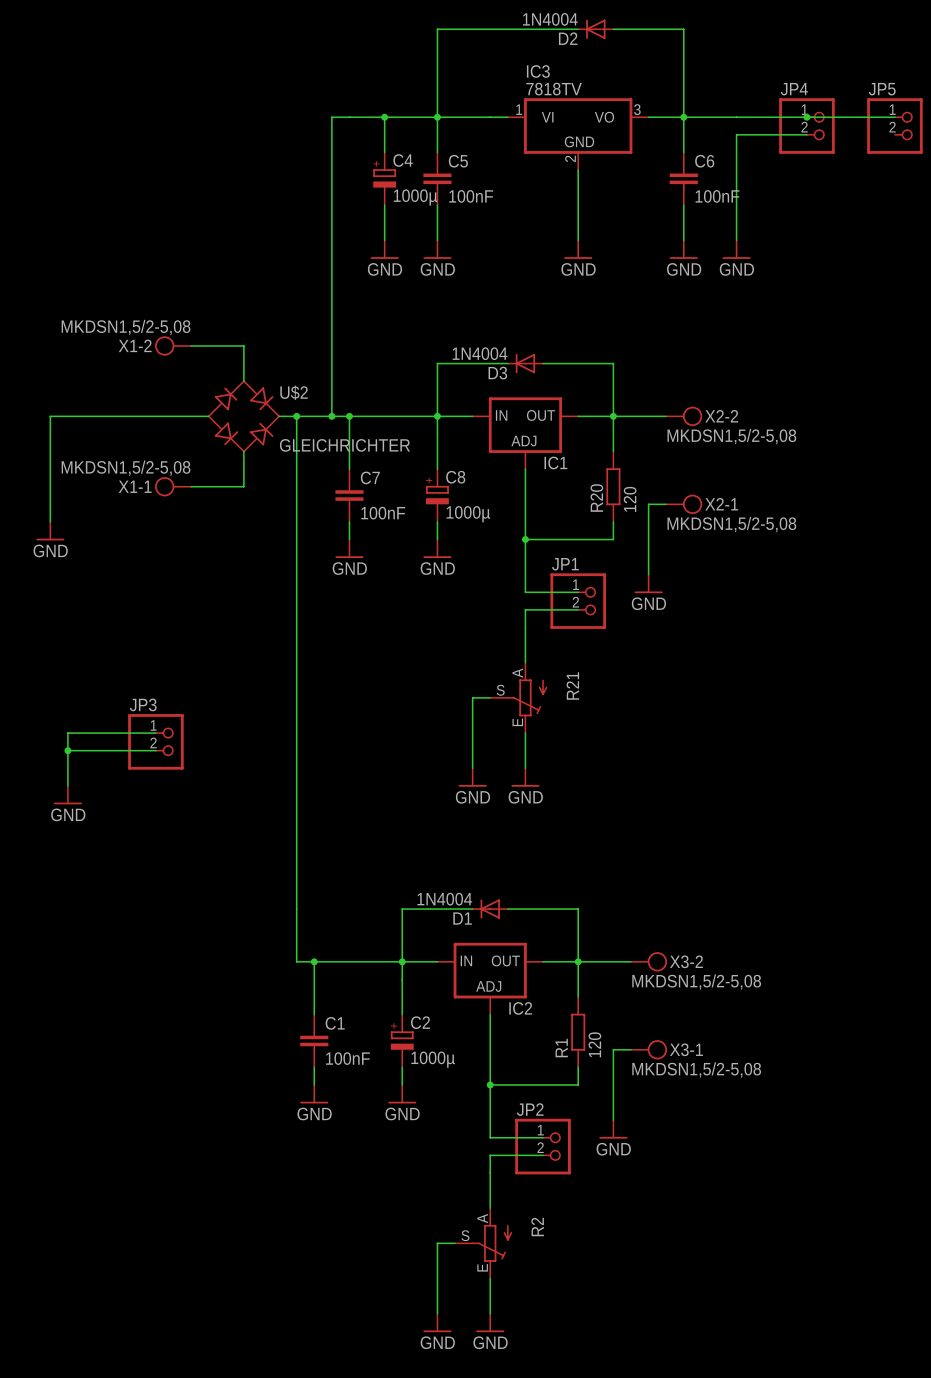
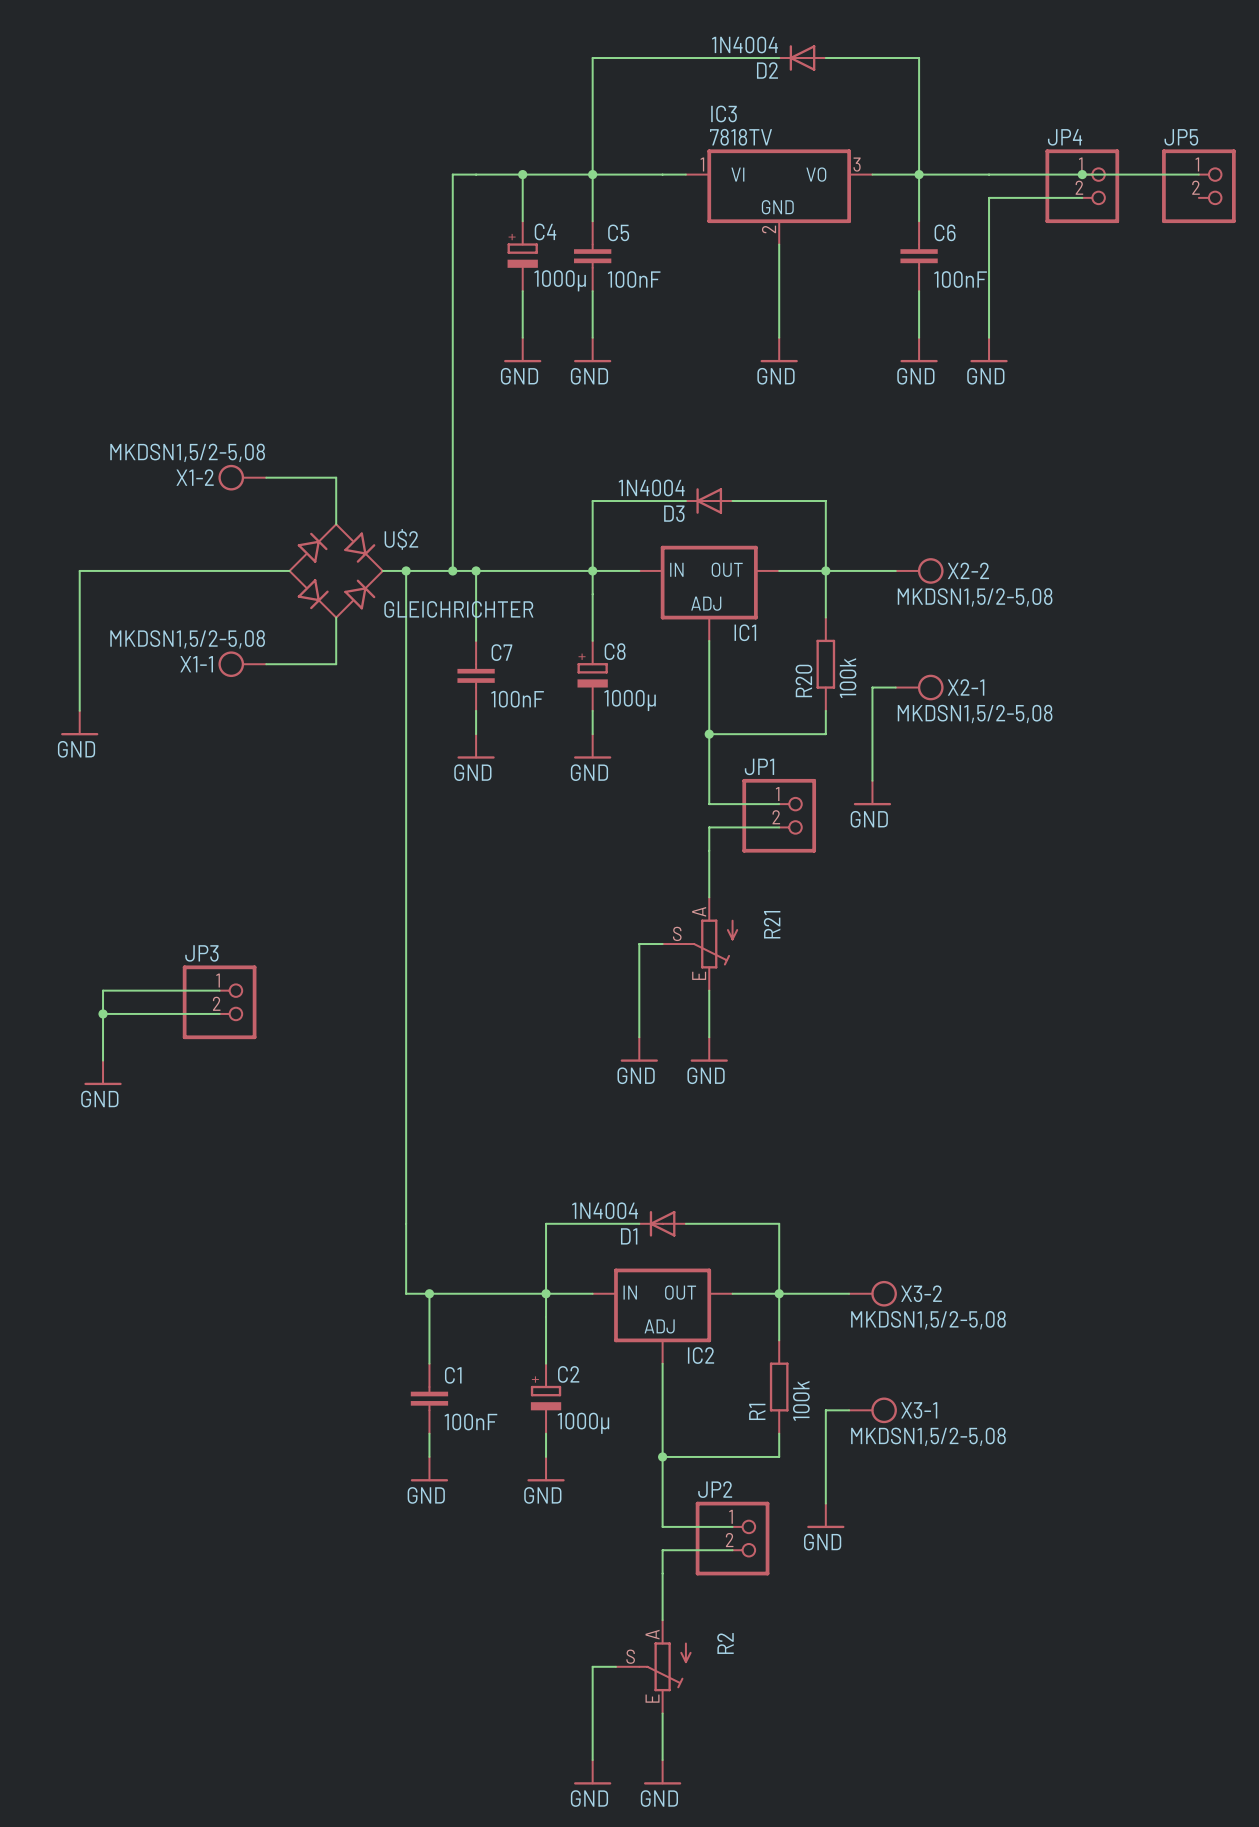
R20 value: 120 (630, 499) -> 100k (847, 678)
R1 value: 120 (594, 1044) -> 100k (801, 1400)

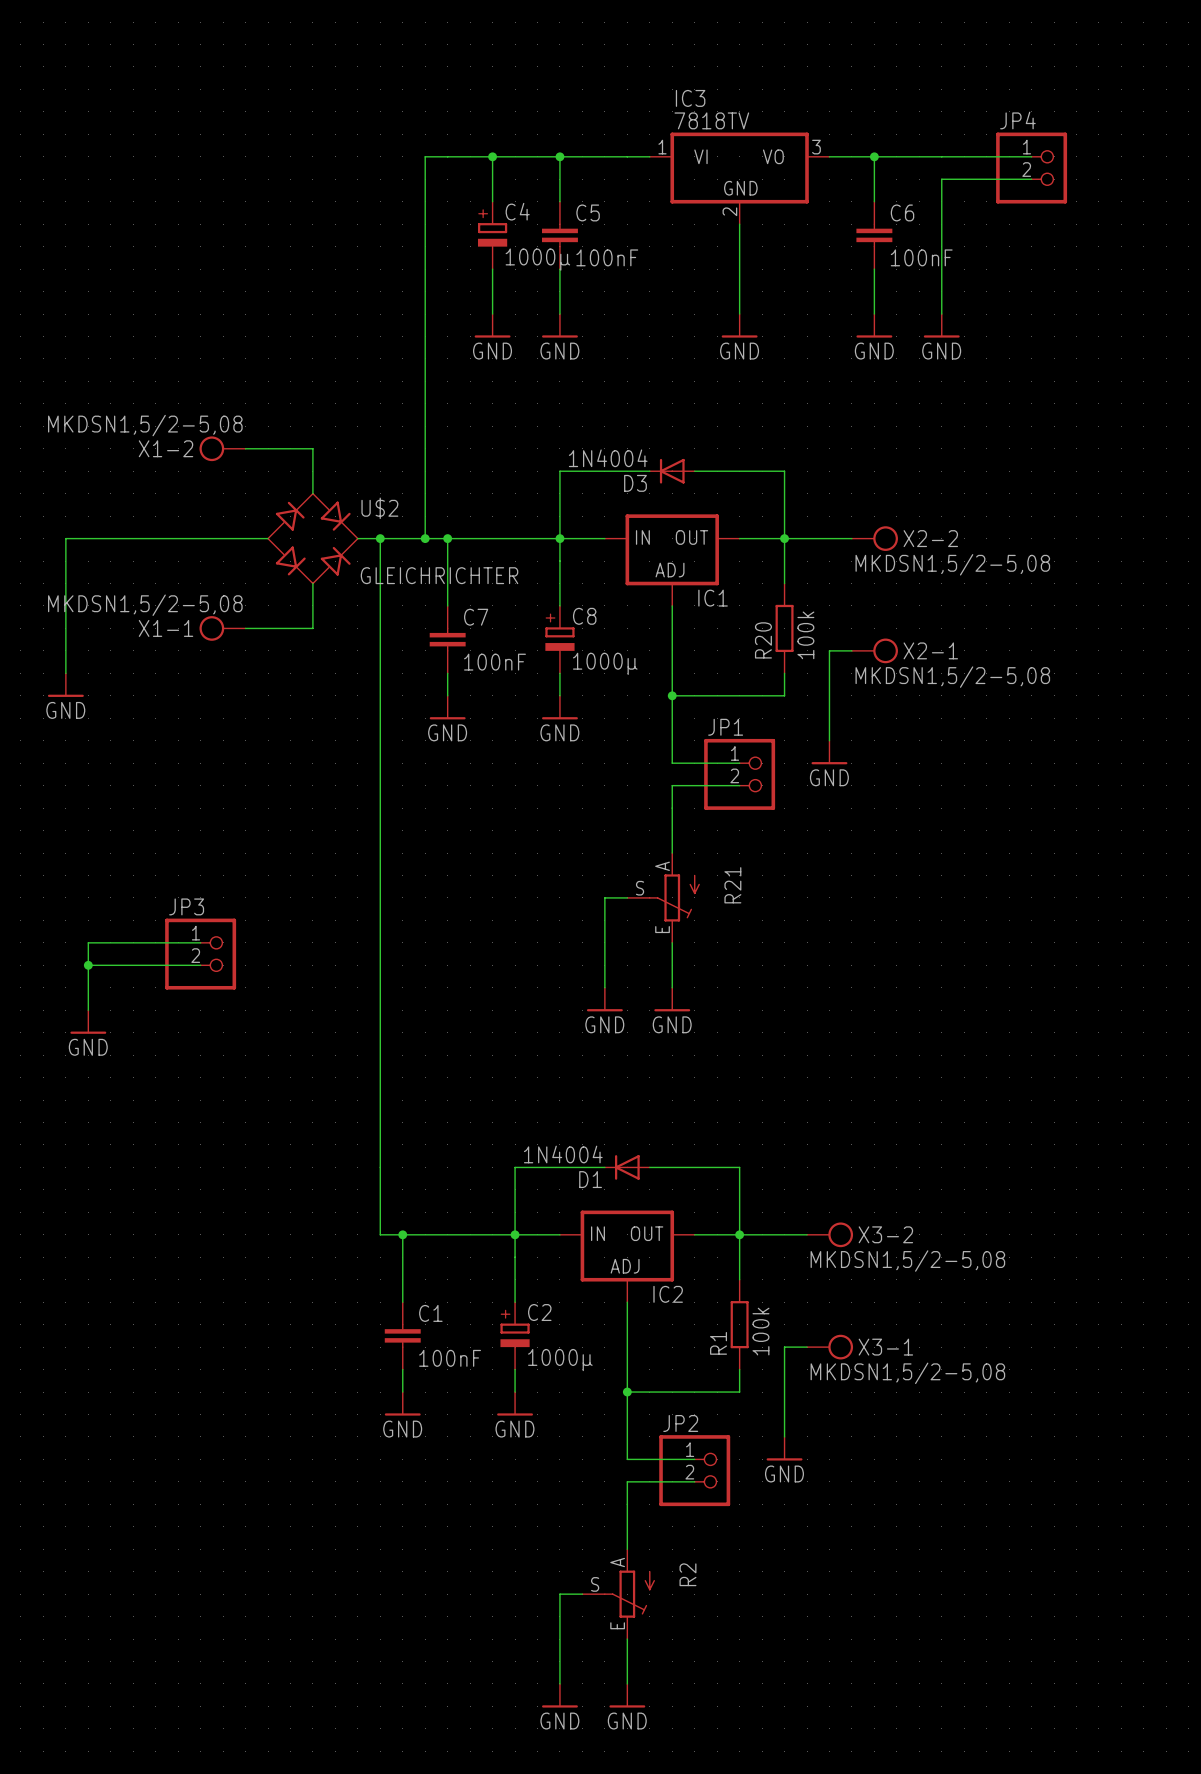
wire: (779, 58) (592, 58) (592, 174) -> none
D2: 1N4004 (802, 58) -> none
wire: (825, 58) (919, 58) (919, 174) -> none
wire: (1082, 174) (1198, 174) -> none
junction: (1082, 174) -> none
JP5: (1198, 186) -> none

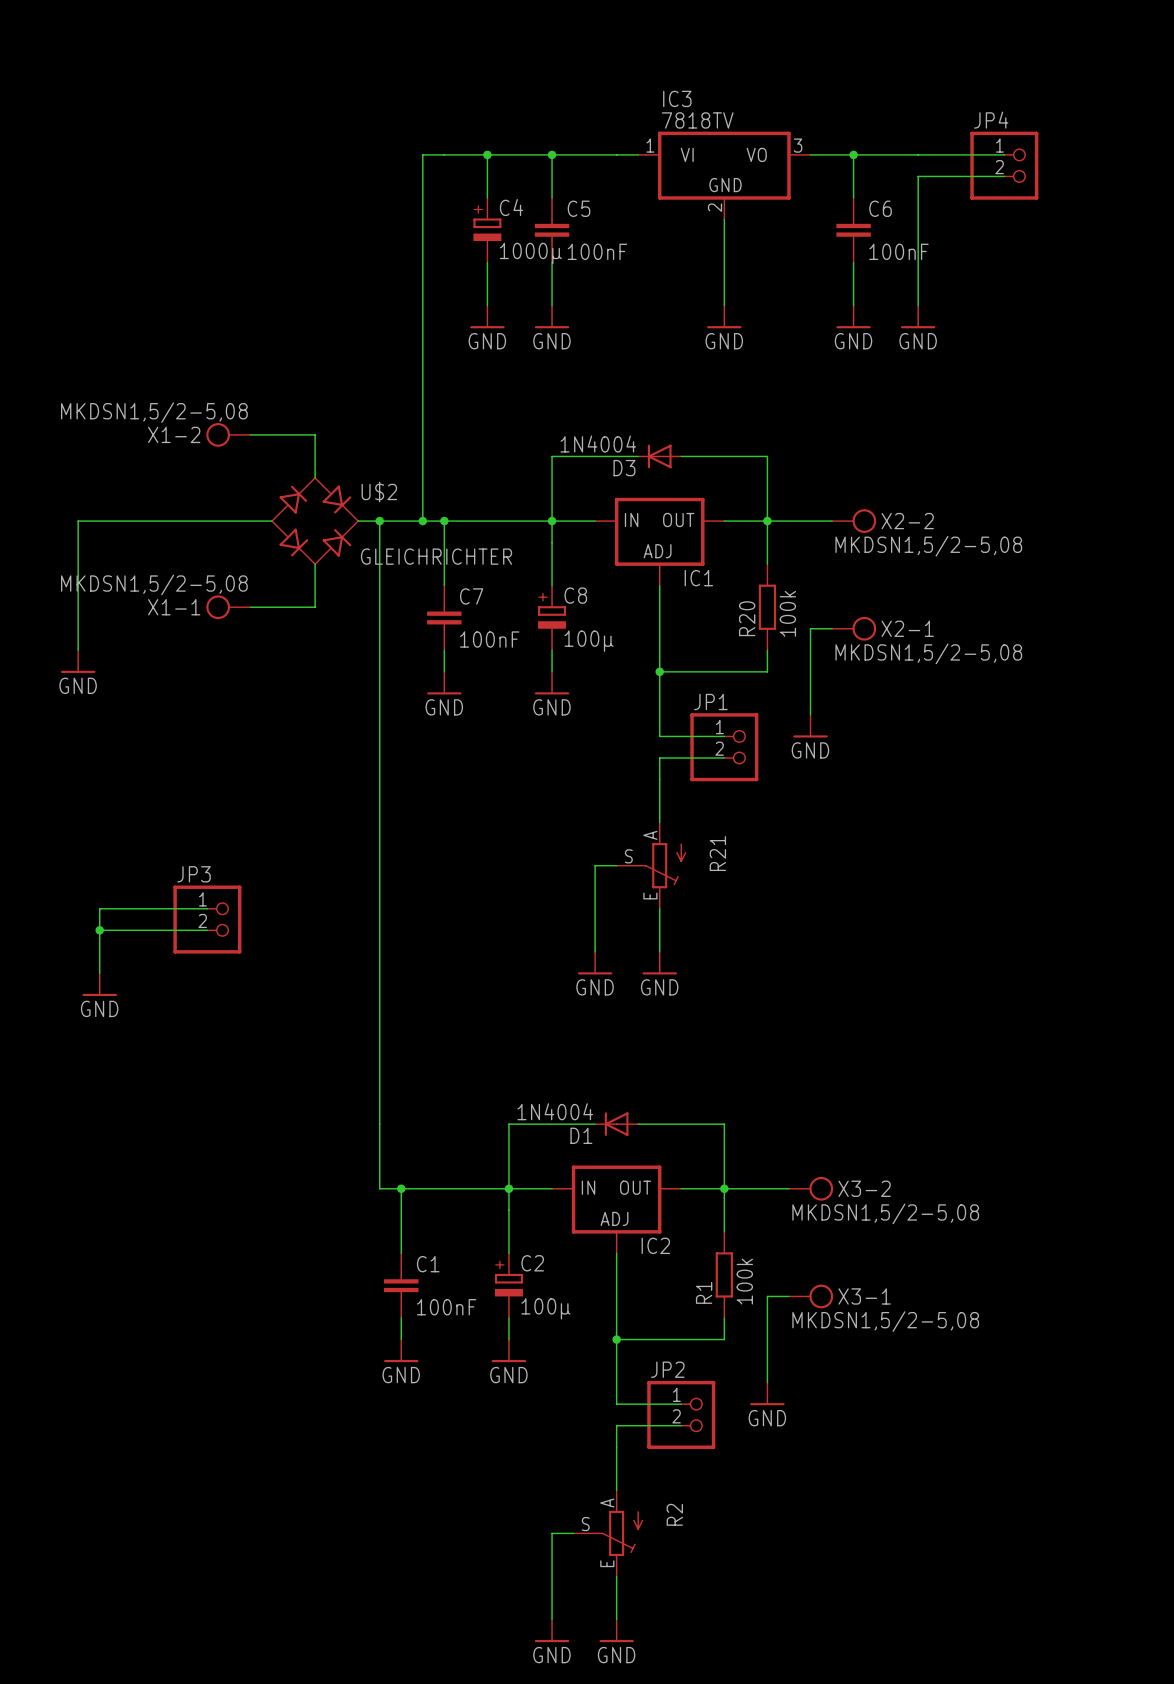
C8 value: 1000µ (605, 663) -> 100µ (589, 641)
C2 value: 1000µ (560, 1360) -> 100µ (545, 1308)

